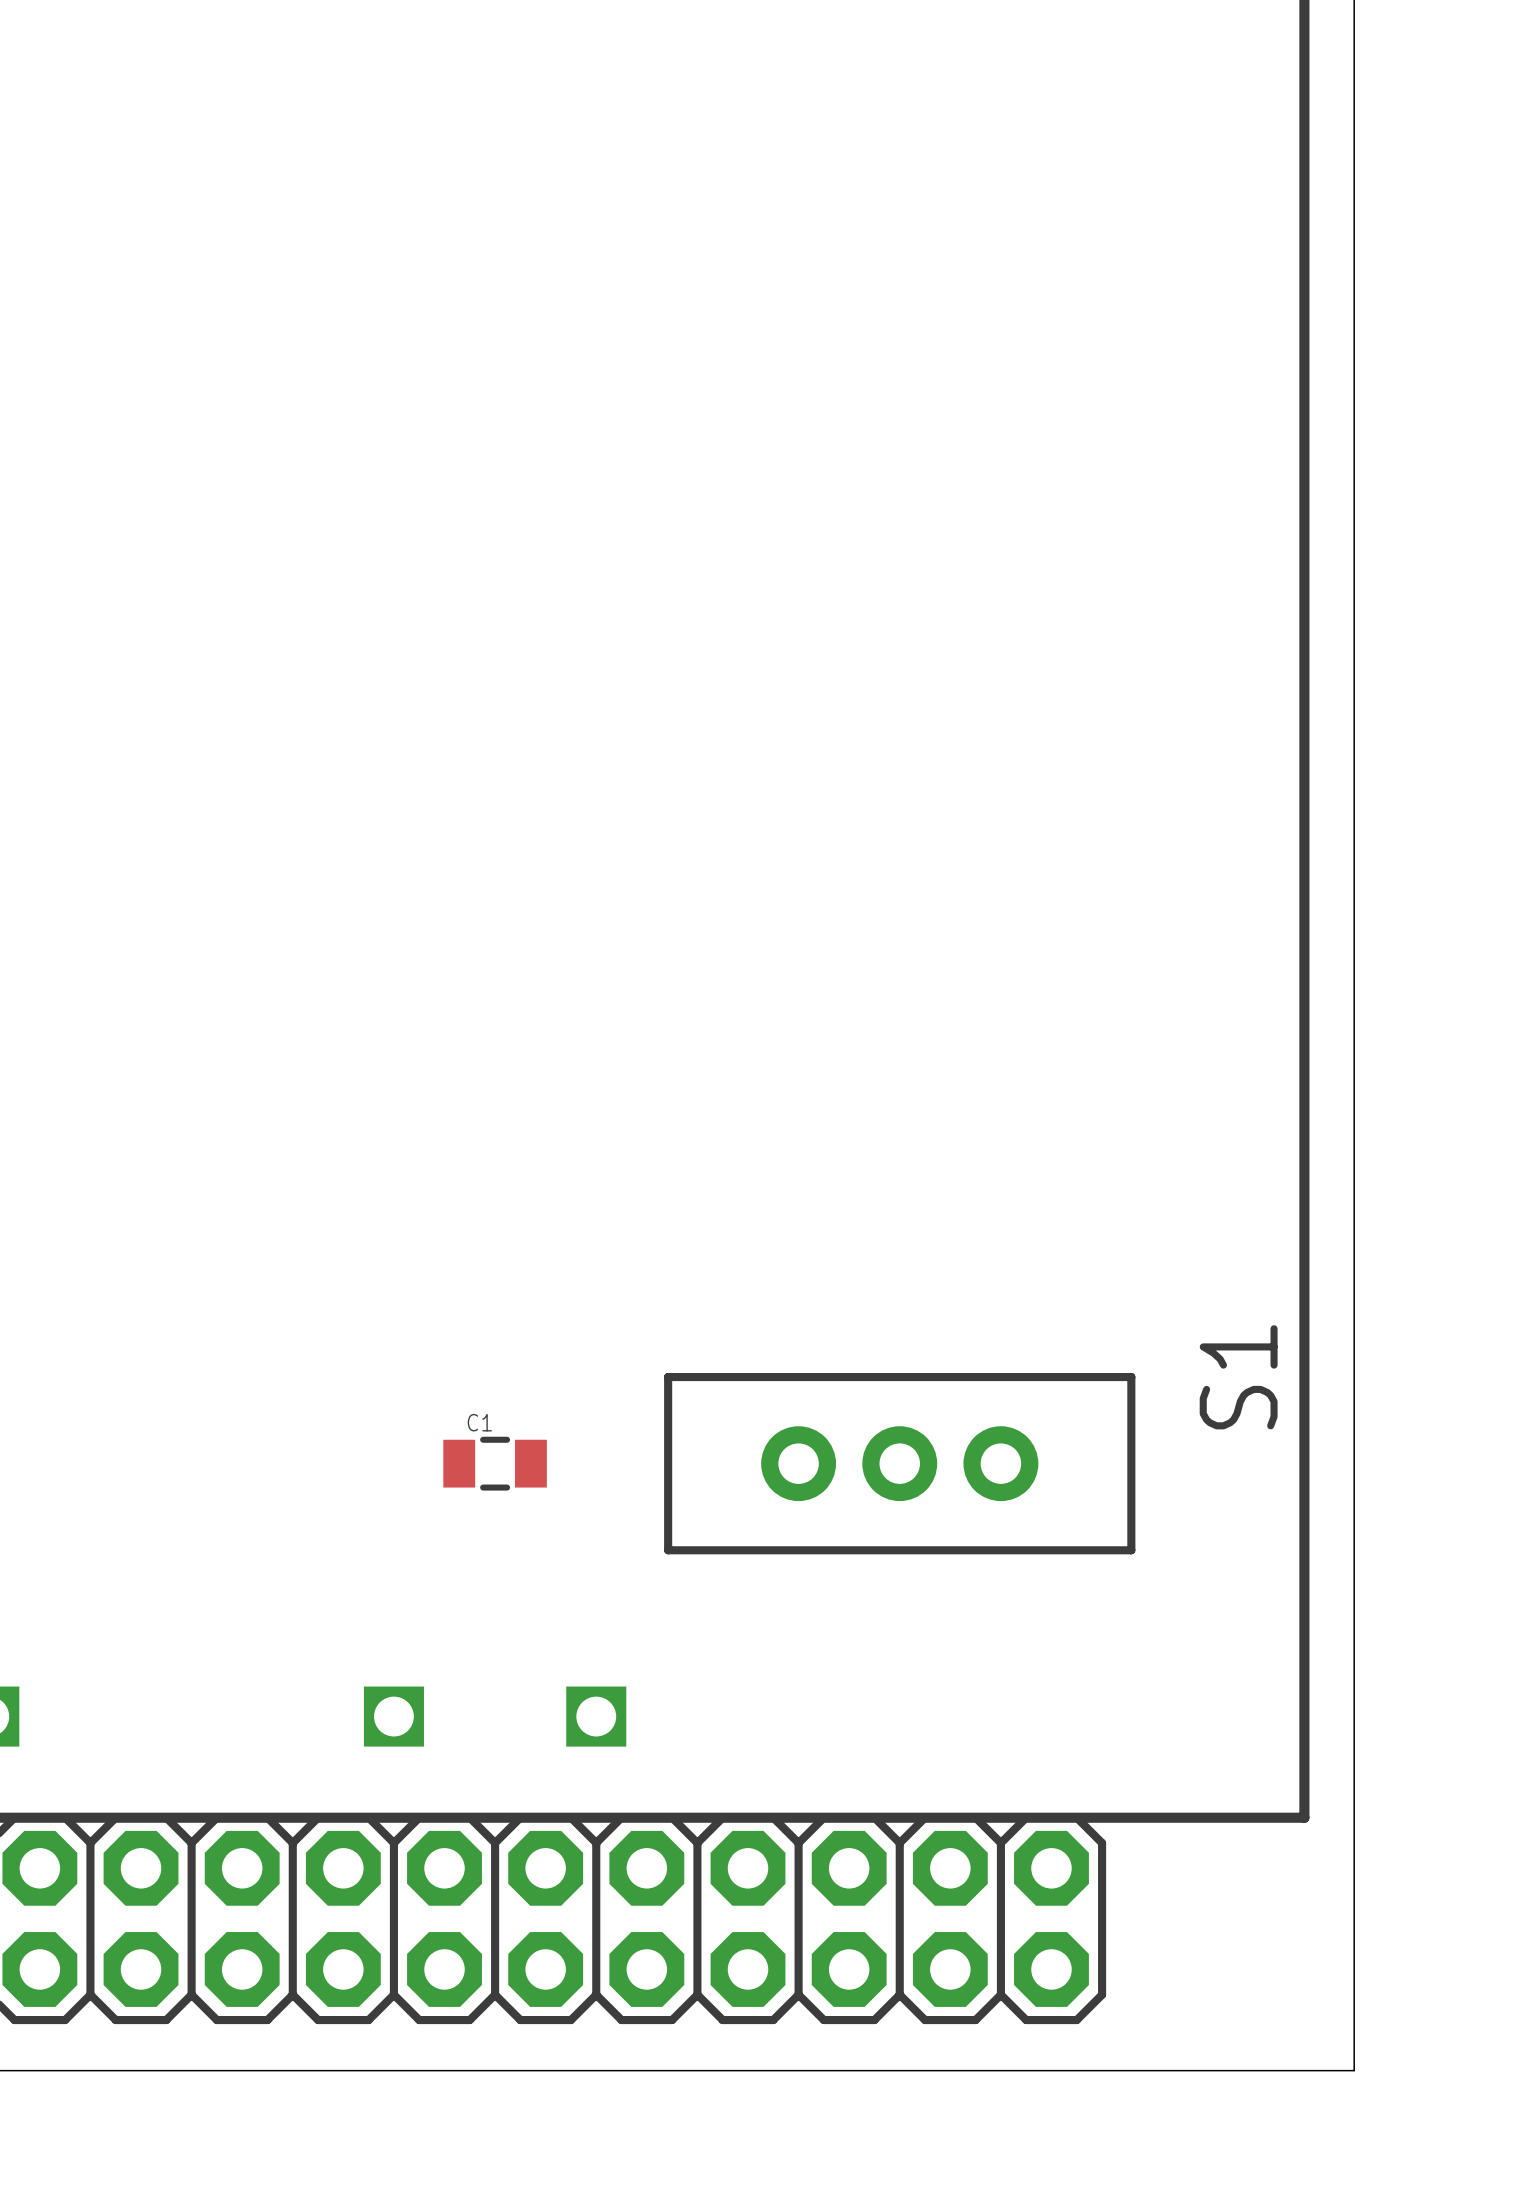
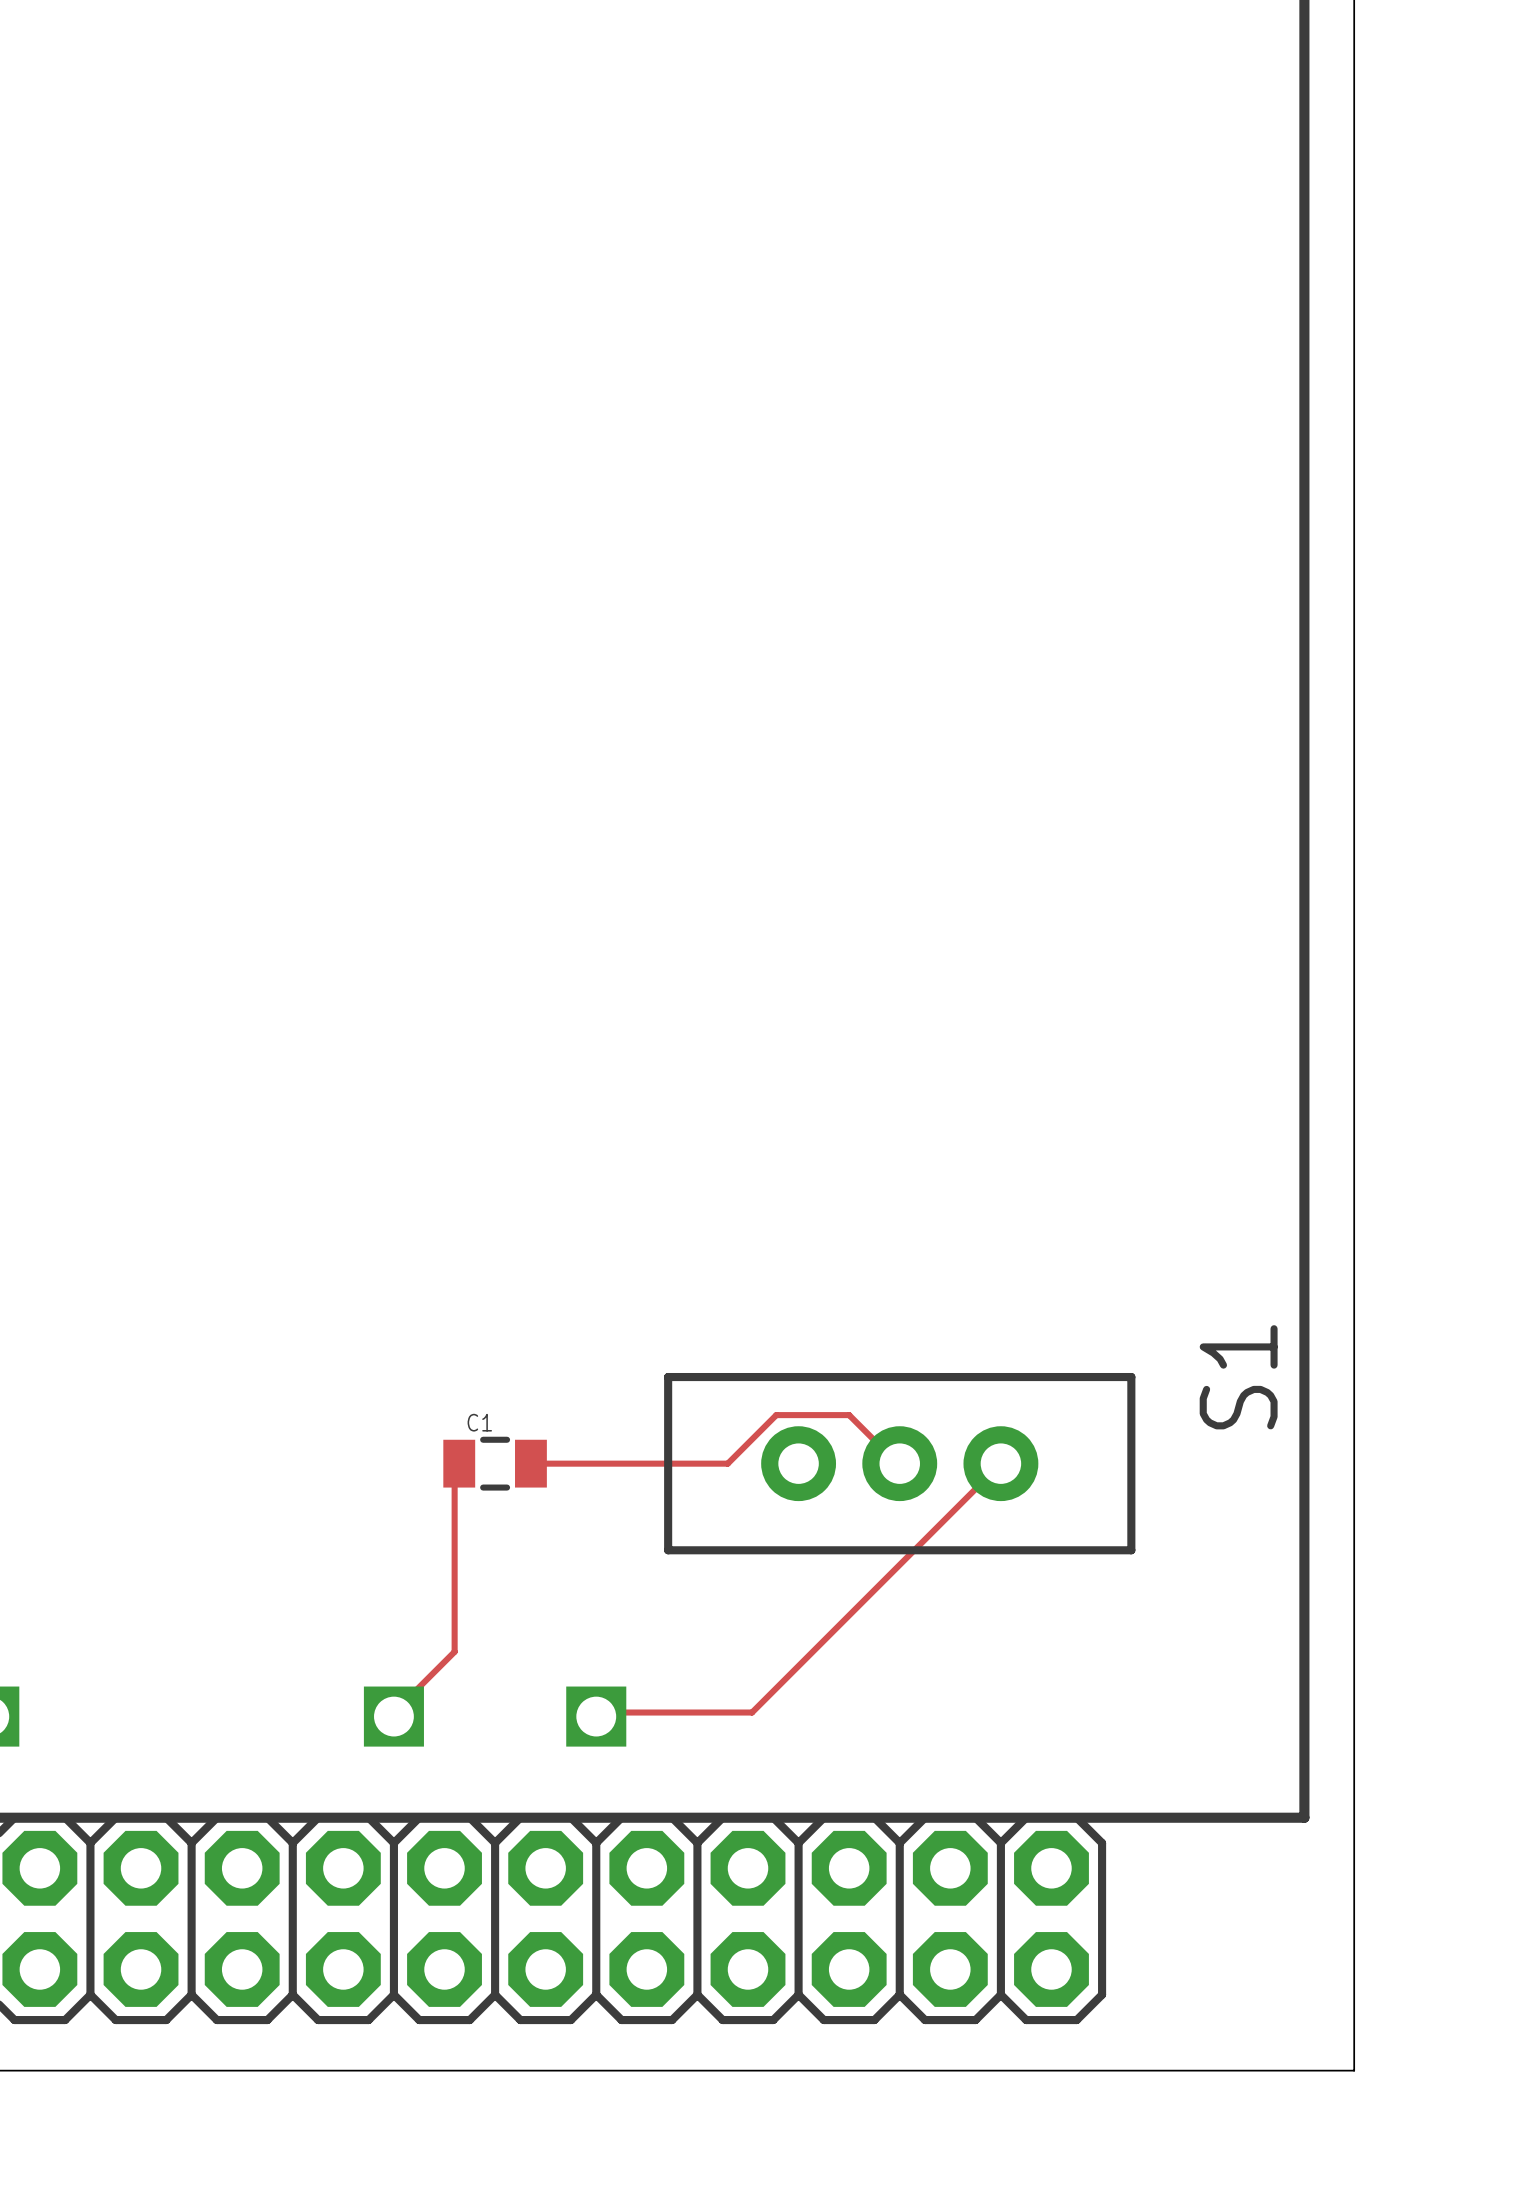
top track: none -> (459, 1463) (454, 1463) (454, 1651) (393, 1712) (393, 1716)
top track: none -> (530, 1463) (727, 1463) (776, 1415) (849, 1415) (899, 1463)
top track: none -> (1000, 1463) (752, 1712) (600, 1712) (596, 1716)

